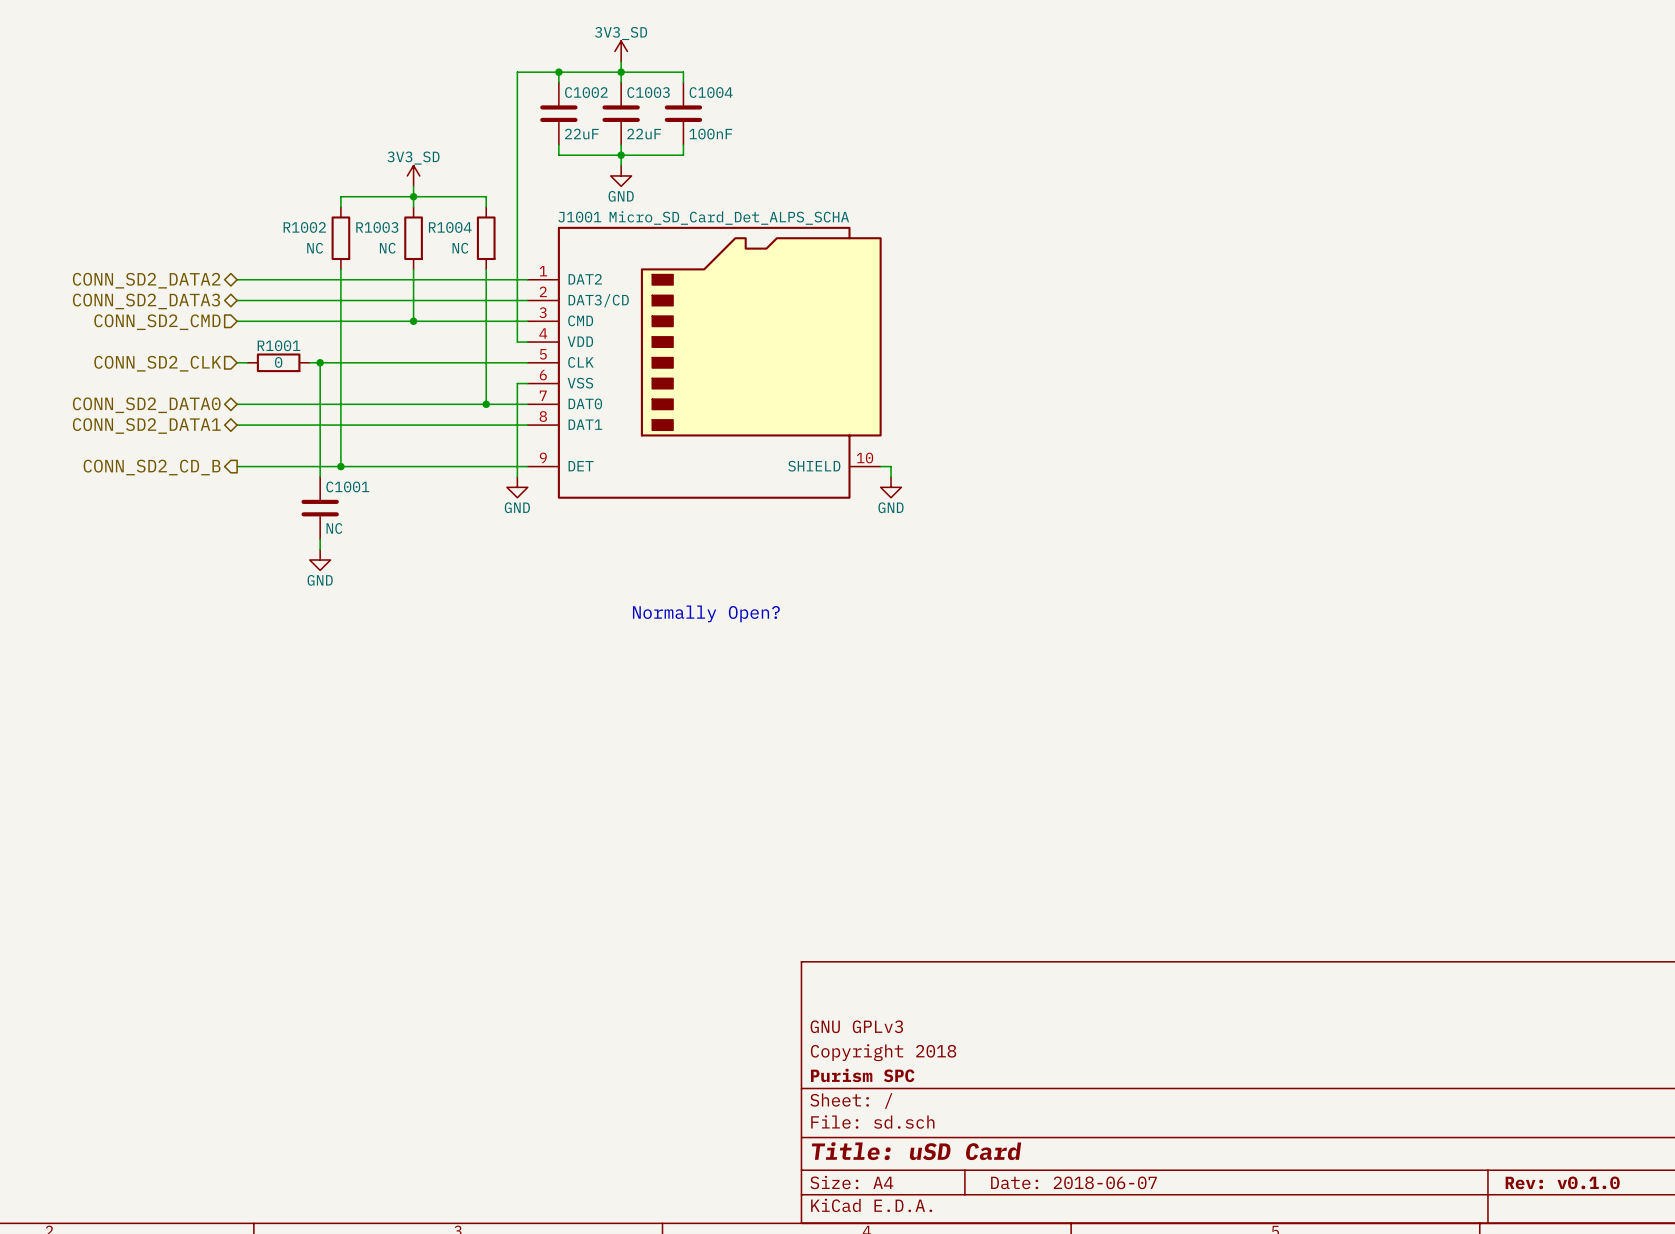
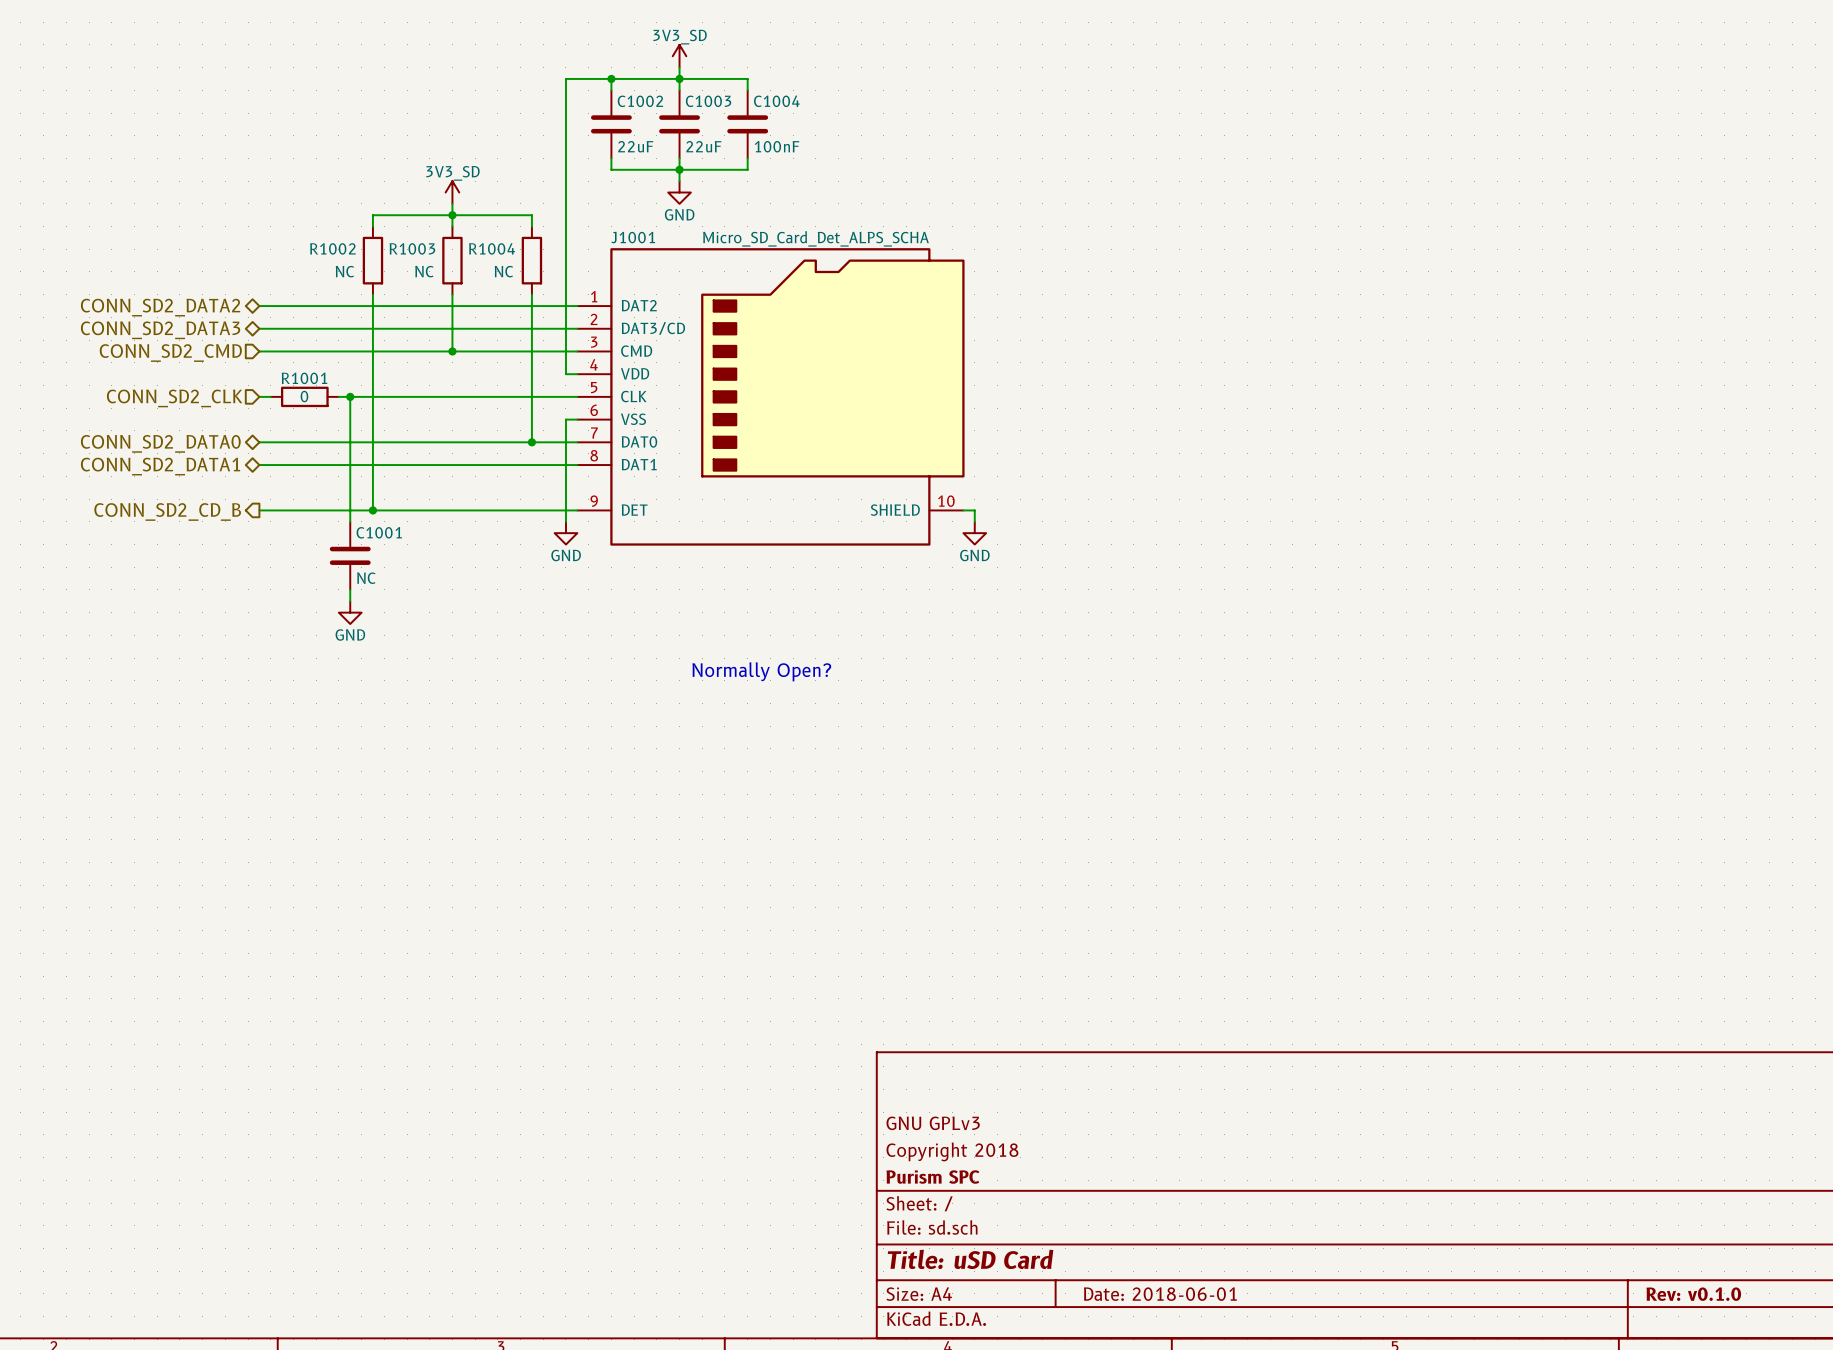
title block: Date: 2018-06-07 (1073, 1182) -> Date: 2018-06-01 (1160, 1294)

